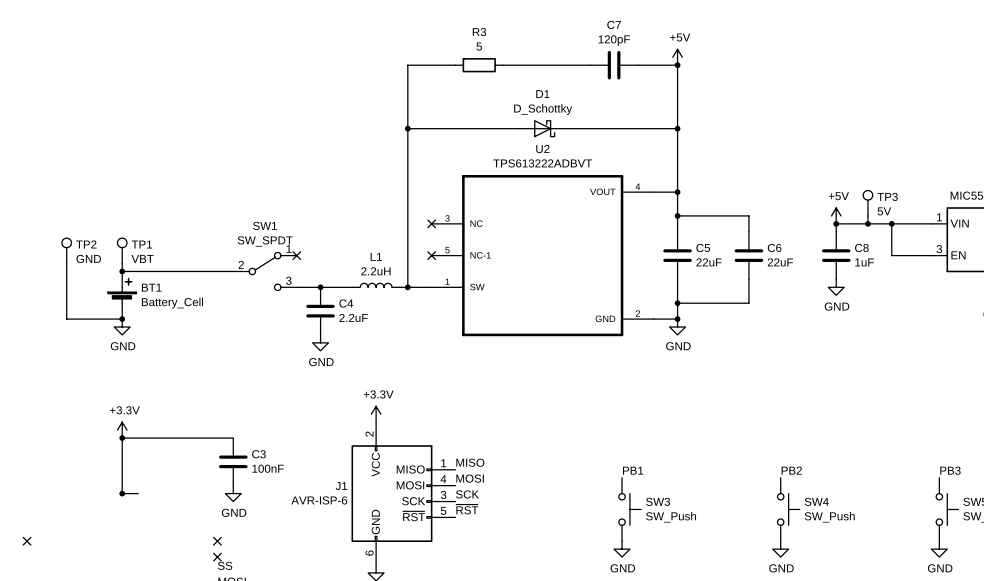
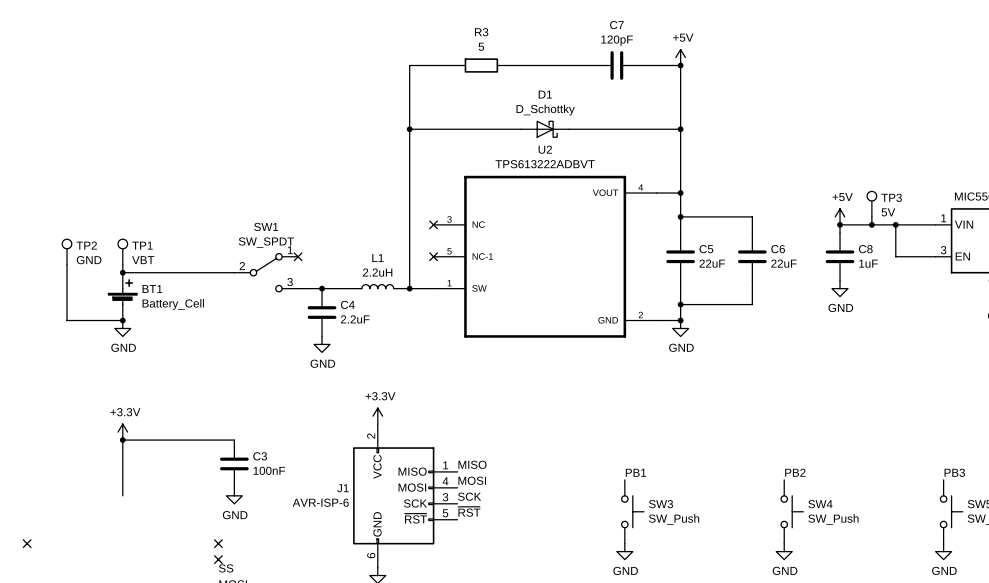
wire: (122, 493) (138, 493) -> none
junction: (122, 493) -> none

